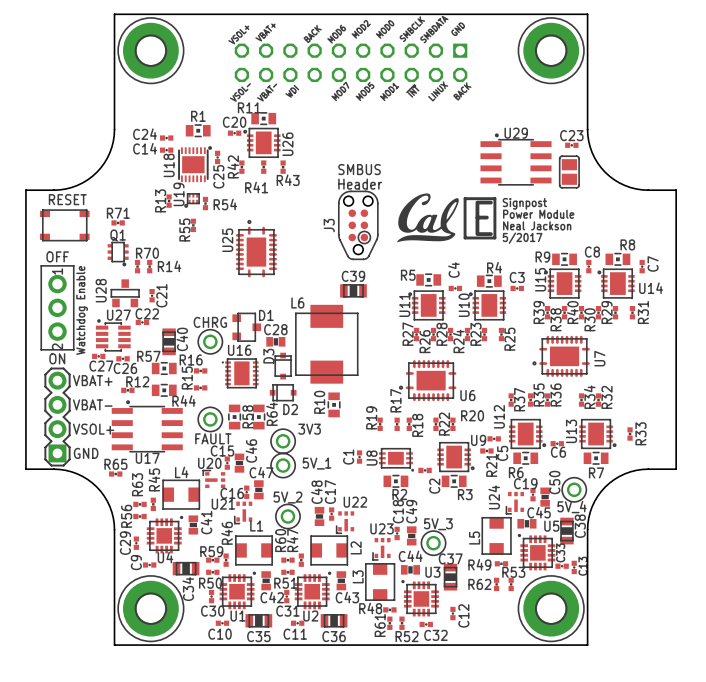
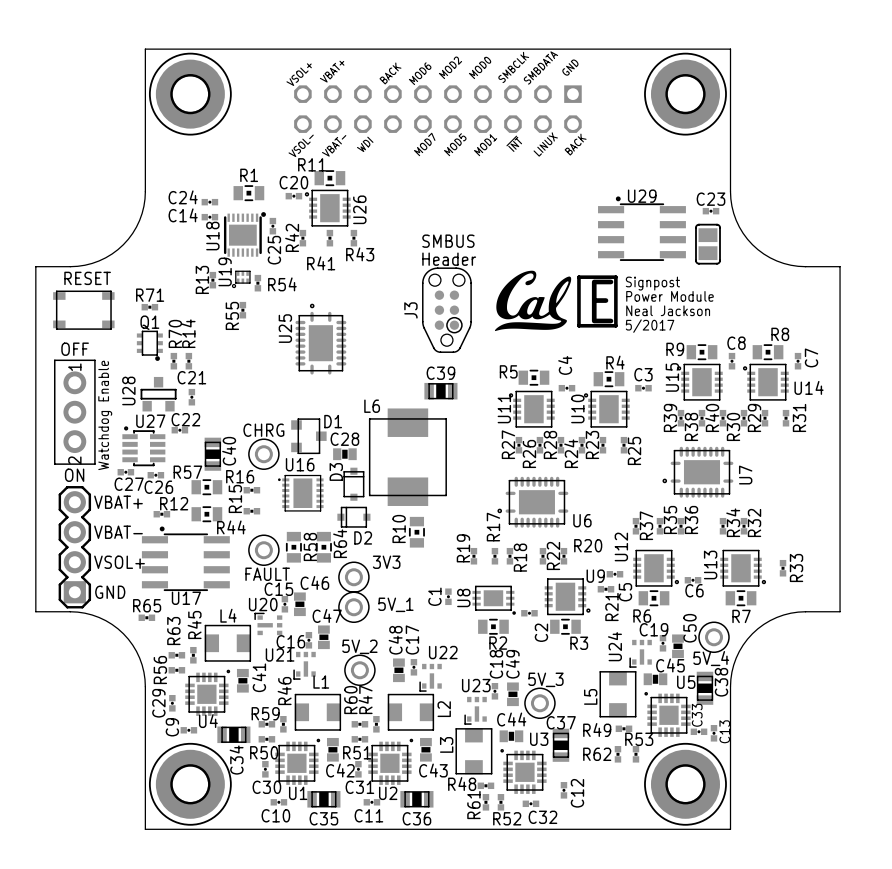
R70 name rotation: 0° (147, 253) -> 90° counterclockwise (175, 333)
R14 name rotation: 0° (169, 266) -> 90° counterclockwise (188, 333)
C21 name rotation: 0° (161, 295) -> 90° clockwise (191, 377)
C46 name rotation: 0° (251, 450) -> 90° clockwise (314, 582)

